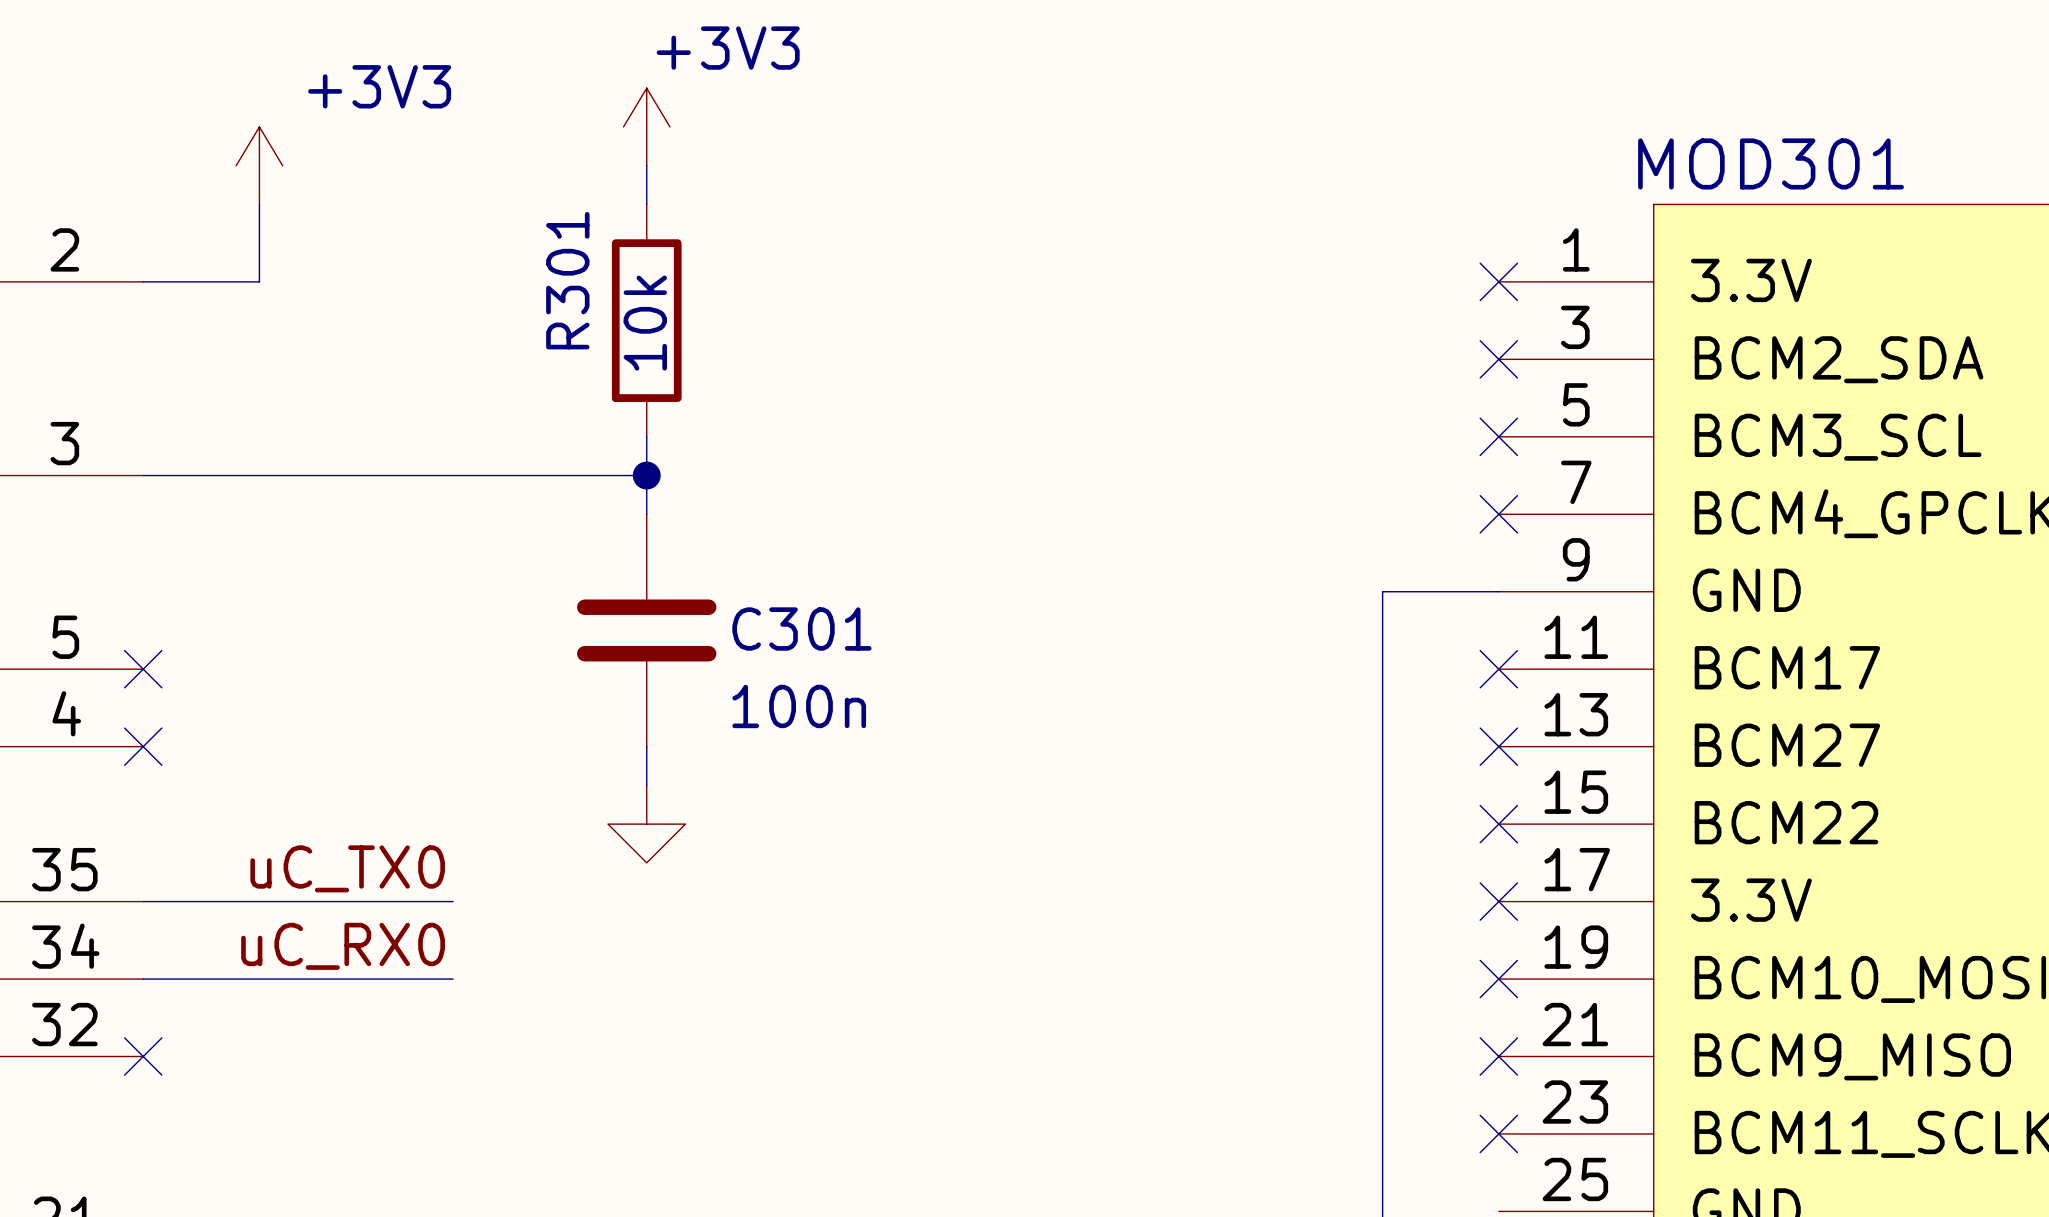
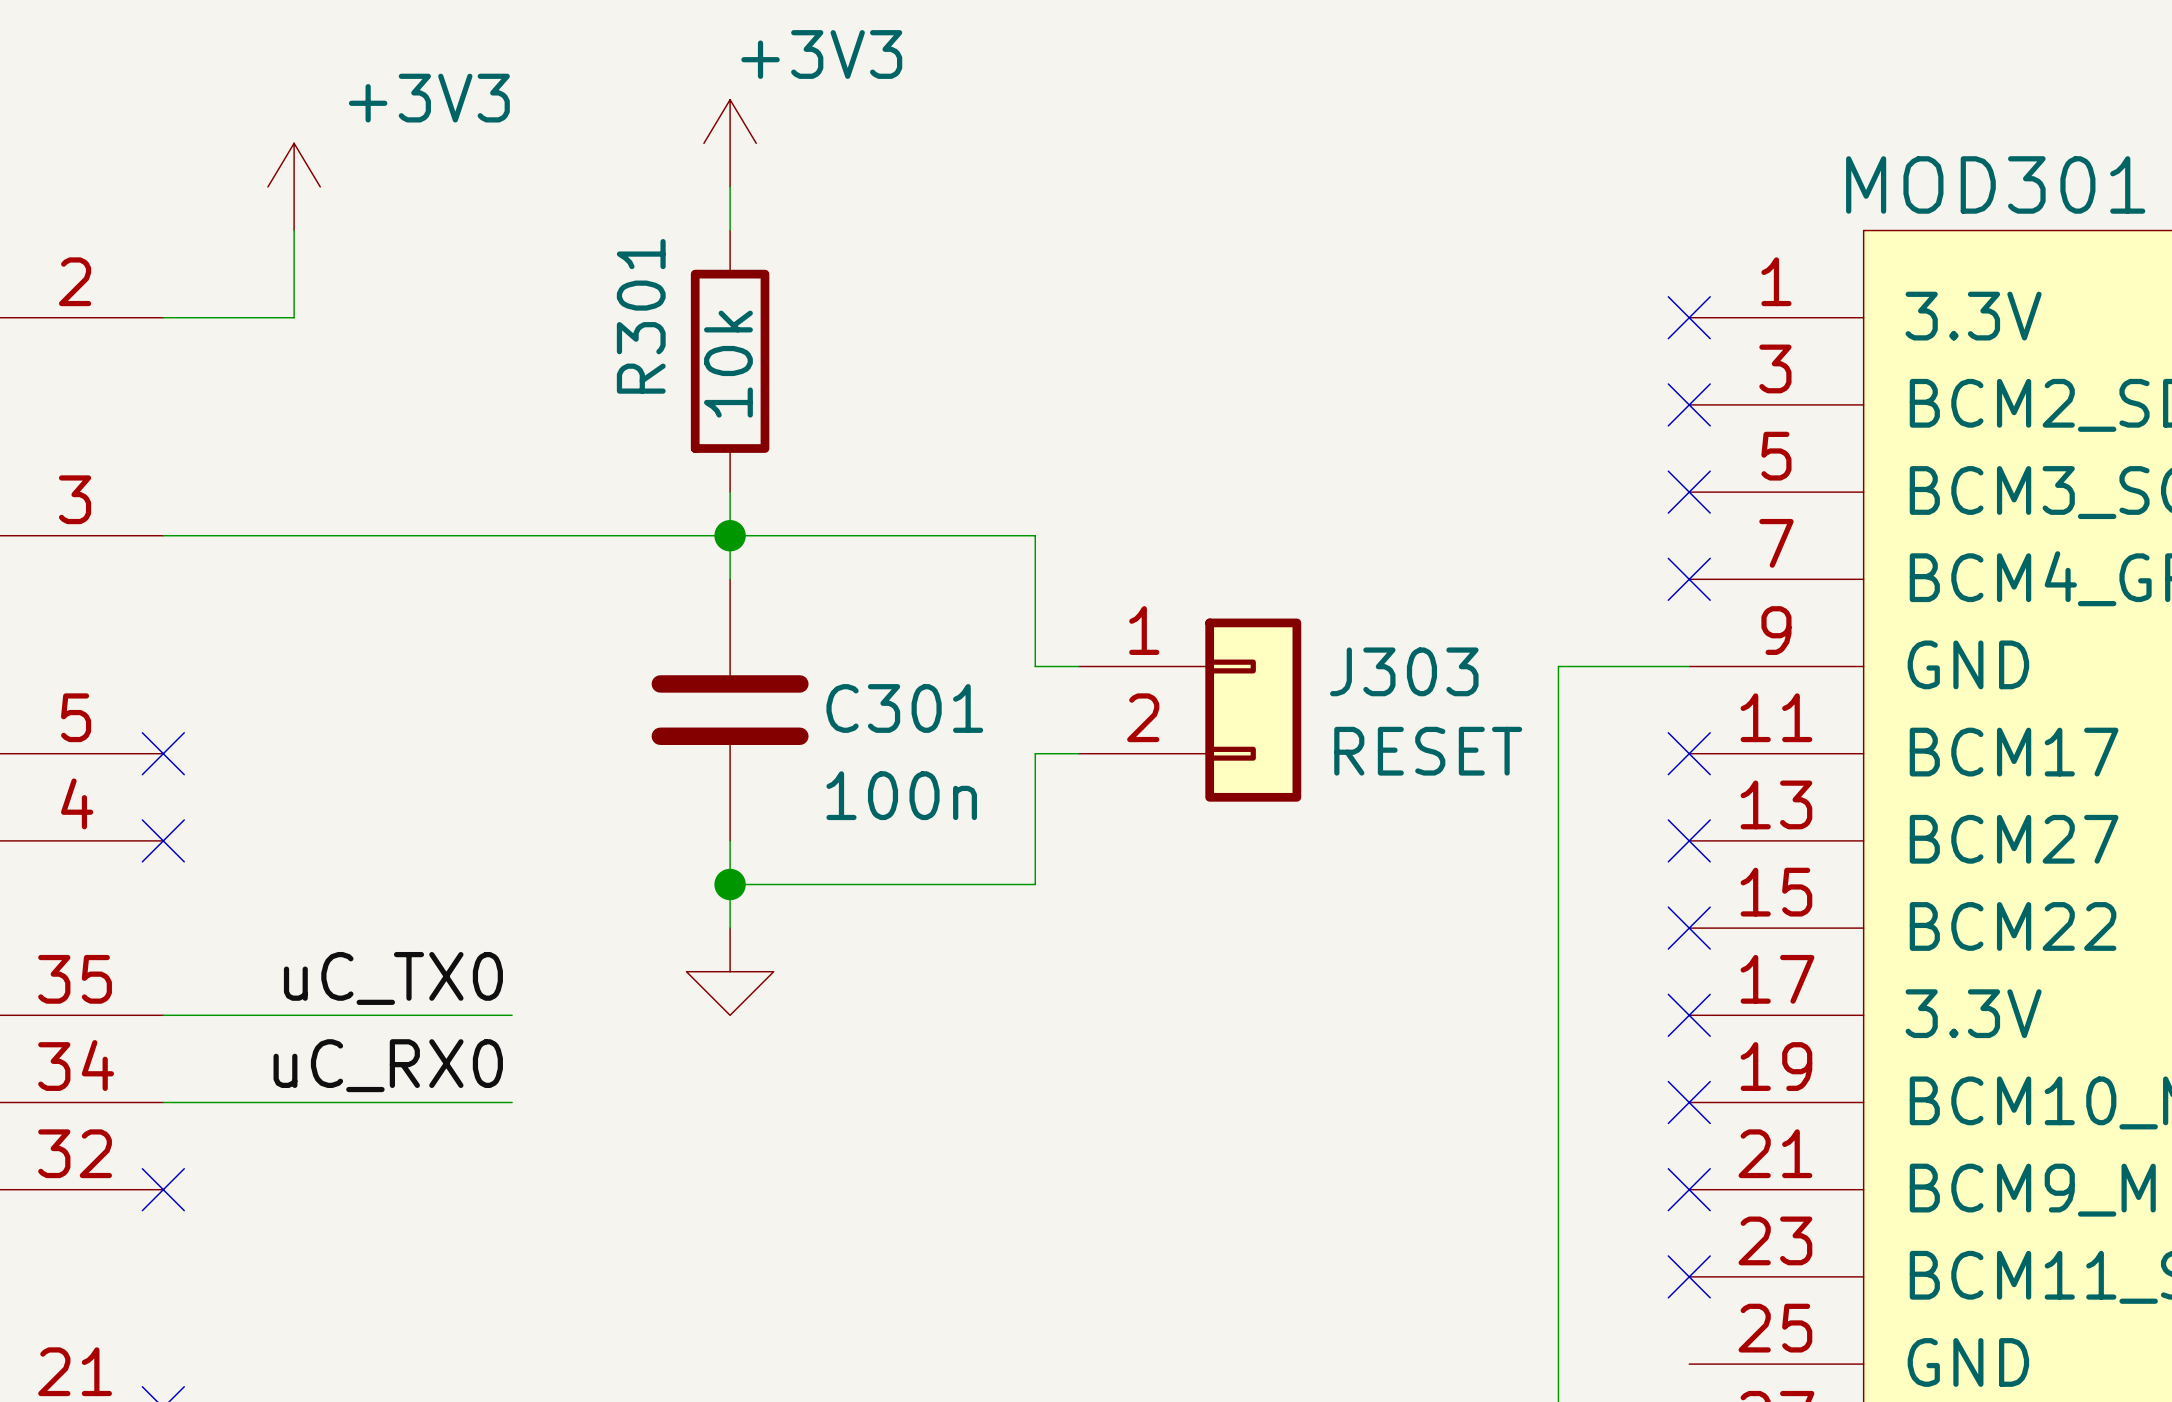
wire: none -> (730, 535) (1035, 535) (1035, 666) (1078, 666)
J303: none -> RESET (1190, 710)
wire: none -> (1078, 753) (1035, 753) (1035, 884) (730, 884) (730, 928)
junction: none -> (730, 884)
power symbol position: (646, 824) -> (730, 971)

